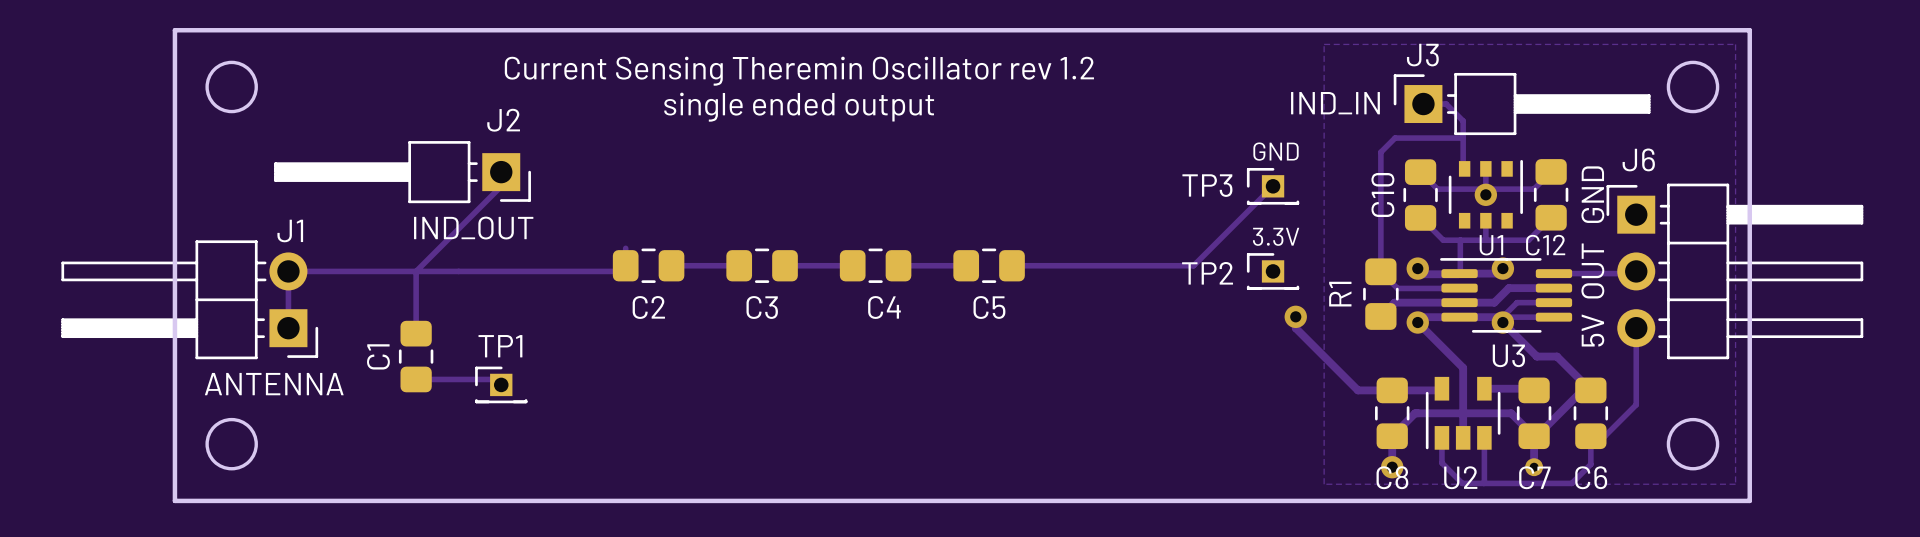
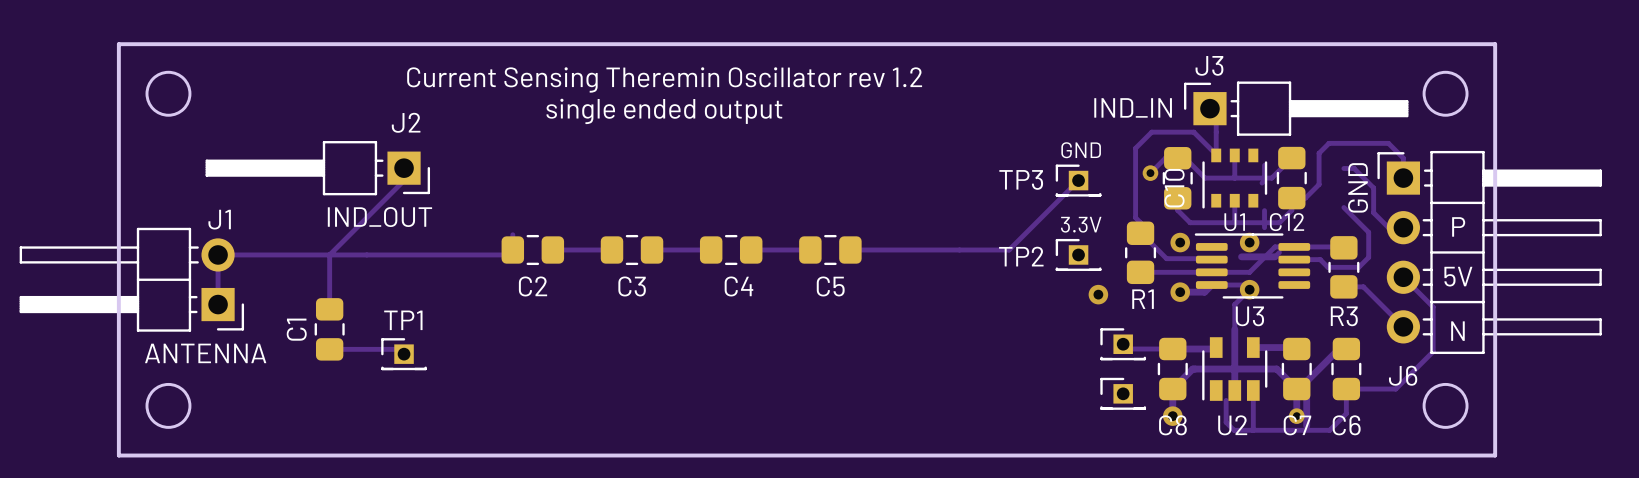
zone outline: (1324, 44) (1324, 484) (1735, 484) (1735, 44) (1324, 44) -> none
track: none -> (1209, 103) (1216, 109) (1216, 155)
track: (1423, 104) (1446, 104) (1463, 121) (1464, 168) -> none
track: (1463, 138) (1395, 138) (1380, 152) (1380, 271) (1397, 288) (1459, 288) -> none
track: none -> (1216, 154) (1193, 132) (1151, 132) (1135, 148) (1135, 217) (1140, 222) (1140, 233) (1166, 258) (1211, 259)
track: none -> (1234, 155) (1234, 178)
J6 name position: J6 (1638, 159) -> J6 (1403, 375)
track: none -> (1291, 158) (1271, 178) (1205, 178) (1185, 158) (1165, 158) (1150, 173)
track: (1551, 171) (1533, 189) (1437, 189) (1420, 172) -> none
track: none -> (1343, 168) (1354, 168) (1373, 188) (1373, 212) (1388, 227) (1403, 227)
via: none -> (1150, 173)
J6 footprint: [1606, 183, 1864, 360] -> [1377, 150, 1602, 355]
track: none -> (1403, 178) (1403, 158) (1388, 143) (1329, 143) (1319, 153) (1319, 184) (1305, 198) (1291, 198) (1291, 210) (1279, 222) (1190, 222) (1177, 210) (1177, 198)
U1 rotation: 0° (1485, 194) -> 180° (1234, 178)
via: (1485, 194) -> none
C12 position: (1551, 194) -> (1291, 178)
C10 position: (1420, 195) -> (1177, 178)
track: none -> (1234, 200) (1234, 222)
track: (1551, 217) (1528, 240) (1443, 240) (1421, 217) -> none
track: none -> (1343, 207) (1368, 232) (1368, 257) (1358, 267) (1327, 267) (1320, 259) (1294, 259)
text: none -> P (1458, 226)
track: (1460, 240) (1458, 274) (1423, 274) (1417, 268) -> none
via: none -> (1180, 242)
via: none -> (1249, 242)
track: none -> (1343, 247) (1275, 246) (1249, 272) (1140, 272)
via: (1417, 268) -> none
via: (1502, 268) -> none
text: OUT (1592, 270) -> none
track: (1636, 271) (1634, 273) (1553, 273) -> none
R3: none -> (1343, 267)
track: (1553, 288) (1508, 288) (1494, 302) (1394, 302) (1380, 316) -> none
R1 name rotation: 0° (1340, 294) -> 90° clockwise (1143, 299)
R1 position: (1380, 294) -> (1140, 252)
U3 position: (1506, 295) -> (1252, 265)
track: (1553, 302) (1517, 302) (1502, 317) -> none
track: none -> (1343, 286) (1363, 286) (1403, 326)
via: none -> (1249, 289)
track: none -> (1180, 292) (1204, 292) (1211, 285) (1244, 285) (1249, 289) (1234, 304) (1234, 390)
via: none -> (1180, 292)
track: (1295, 316) (1295, 328) (1357, 390) (1440, 390) (1441, 388) -> none
track: (1459, 317) (1497, 317) (1536, 356) (1557, 356) (1590, 390) (1582, 390) (1536, 436) (1534, 436) (1522, 424) -> none
track: (1502, 317) (1423, 317) (1417, 322) (1463, 367) (1463, 437) -> none
track: (1502, 317) (1553, 317) -> none
via: (1417, 322) -> none
via: (1502, 322) -> none
track: (1636, 328) (1636, 404) (1604, 436) (1590, 436) (1590, 464) (1571, 483) (1462, 483) (1450, 472) -> (1403, 277) (1433, 307) (1433, 351) (1395, 389) (1346, 389) (1346, 413) (1329, 430) (1234, 430)
text rotation: 0° (1592, 330) -> 90° clockwise (1458, 276)
text position: 5V (1592, 330) -> 5V (1458, 276)
U3 name position: U3 (1508, 355) -> U3 (1249, 316)
text: none -> N (1457, 331)
track: none -> (1123, 344) (1127, 349) (1216, 347)
part: none -> (1123, 344)
track: none -> (1346, 349) (1339, 349) (1299, 389) (1296, 389) (1296, 416)
track: (1484, 388) (1532, 388) (1534, 390) -> (1253, 347) (1296, 349)
C8 position: (1392, 413) -> (1172, 369)
U2 position: (1463, 413) -> (1234, 369)
track: (1511, 413) (1415, 413) (1392, 436) (1392, 467) -> (1286, 378) (1276, 369) (1192, 369) (1172, 389) (1172, 416)
C7 position: (1534, 413) -> (1296, 369)
C6 position: (1590, 413) -> (1346, 369)
part: none -> (1123, 393)
track: (1484, 437) (1483, 483) -> (1253, 390) (1252, 430)
via position: (1392, 467) -> (1172, 416)
via position: (1534, 467) -> (1296, 416)

